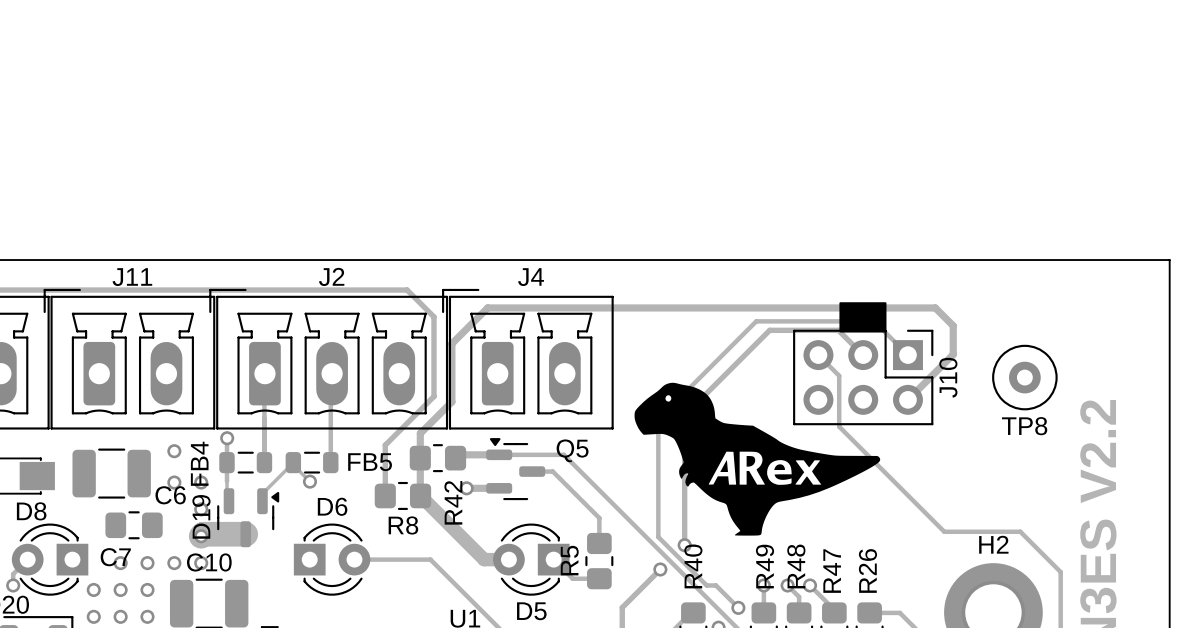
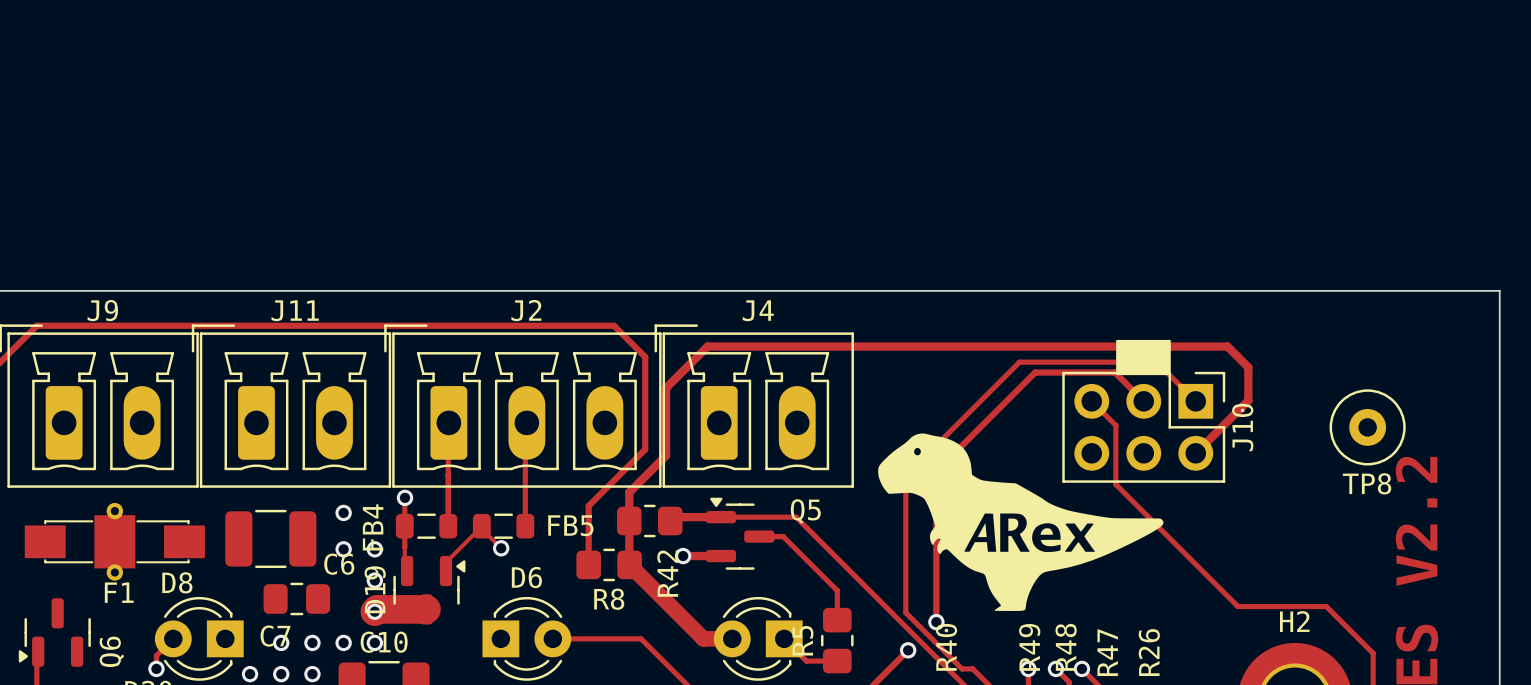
TP8 position: (1024, 377) -> (1367, 427)

